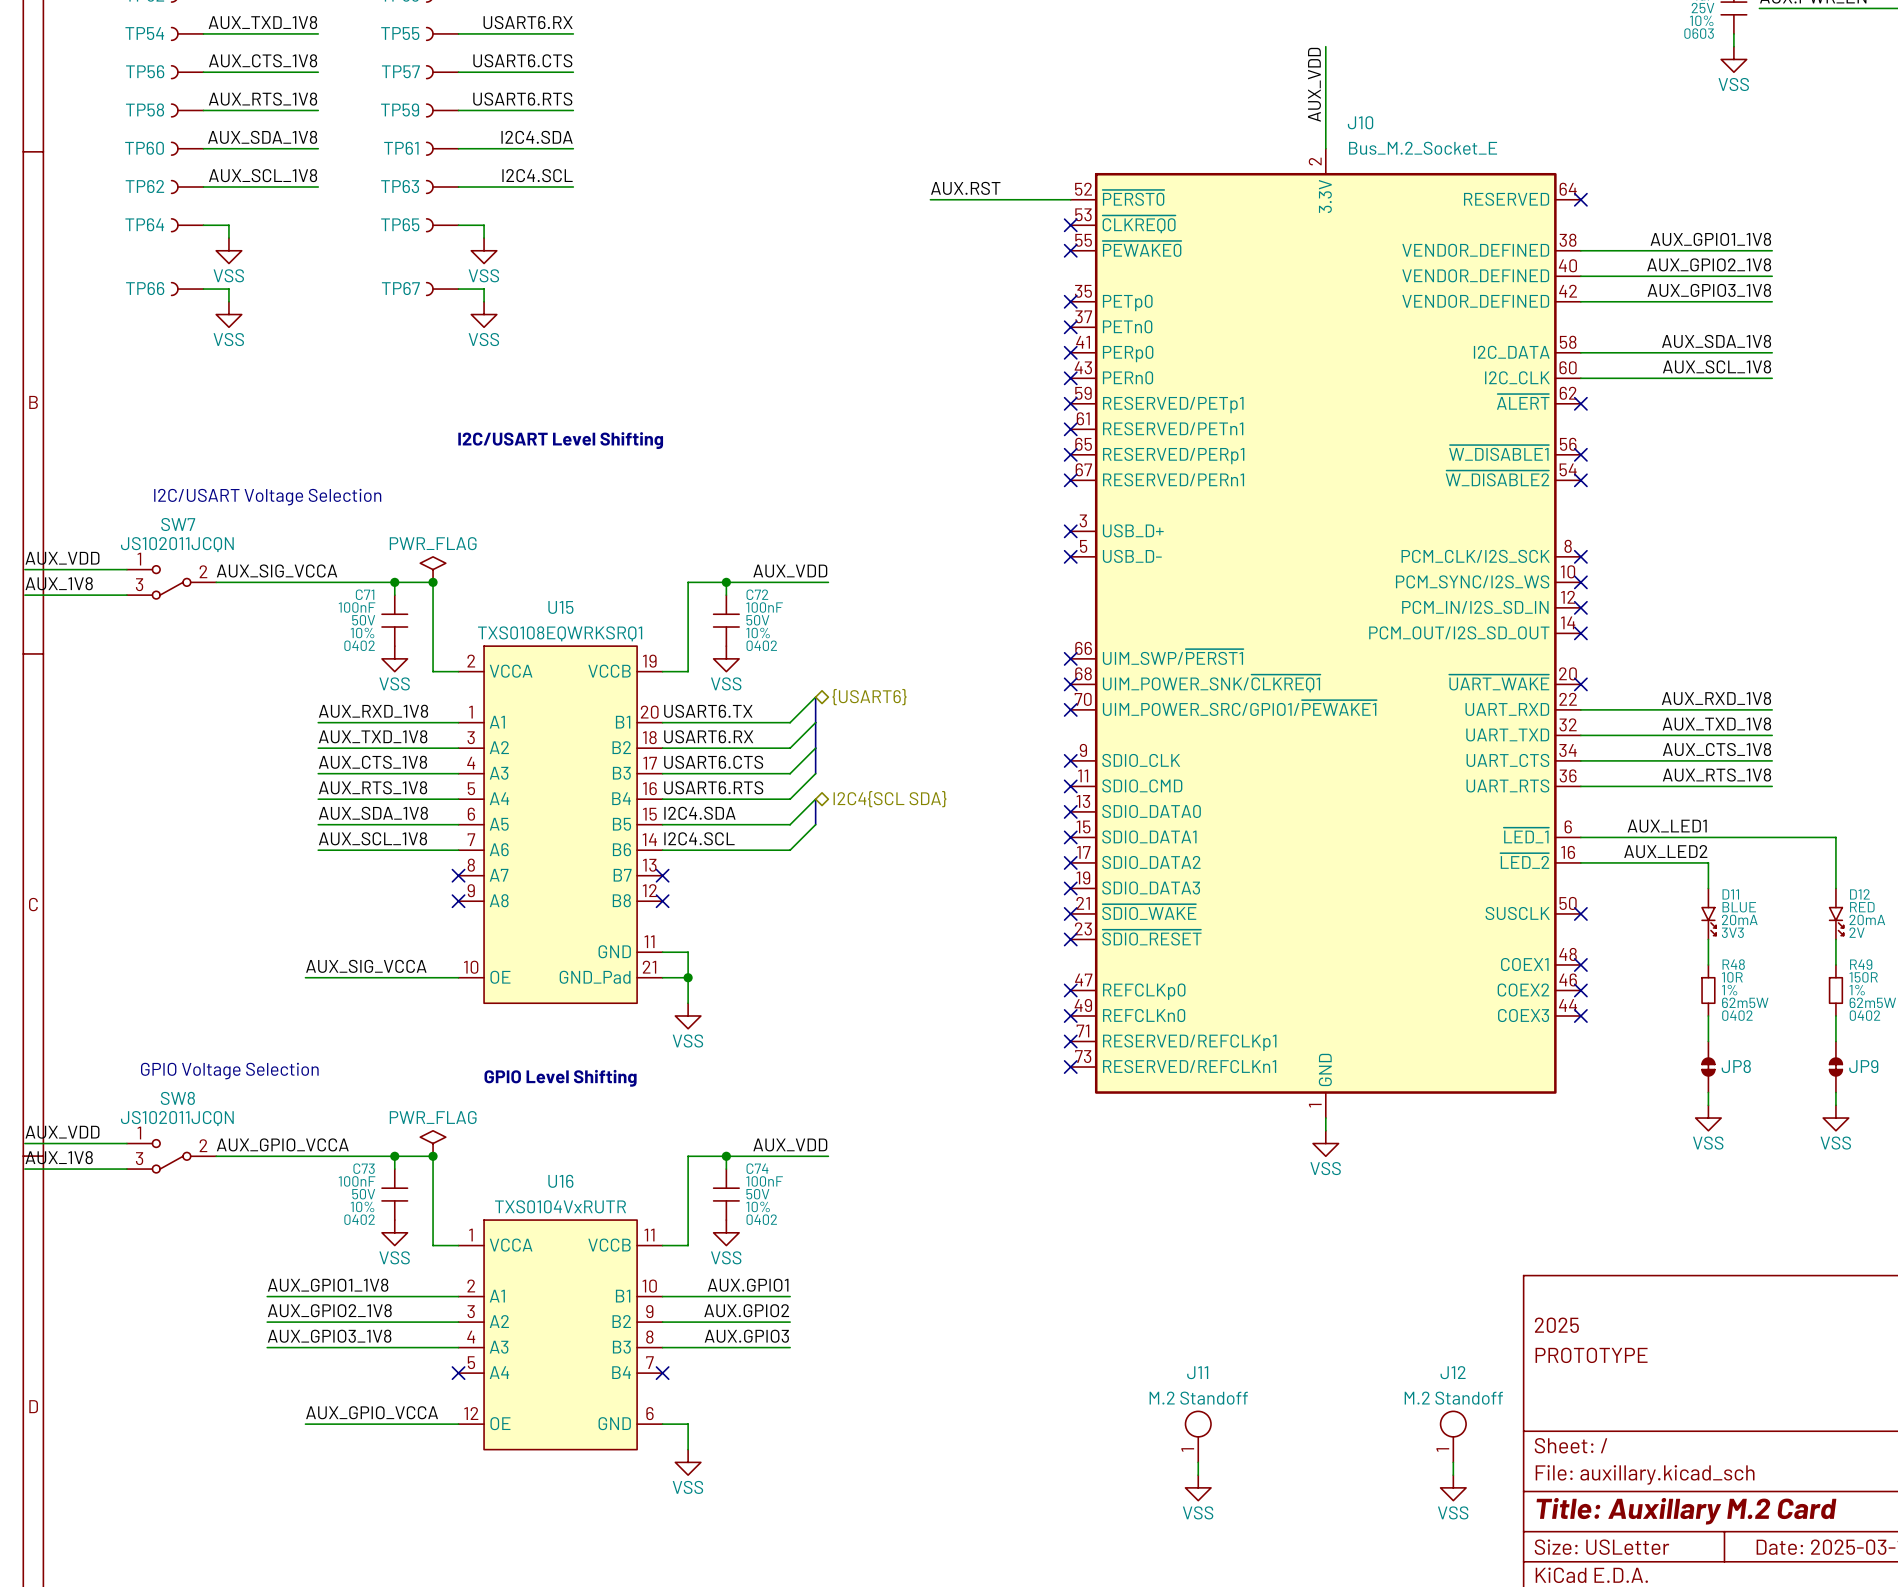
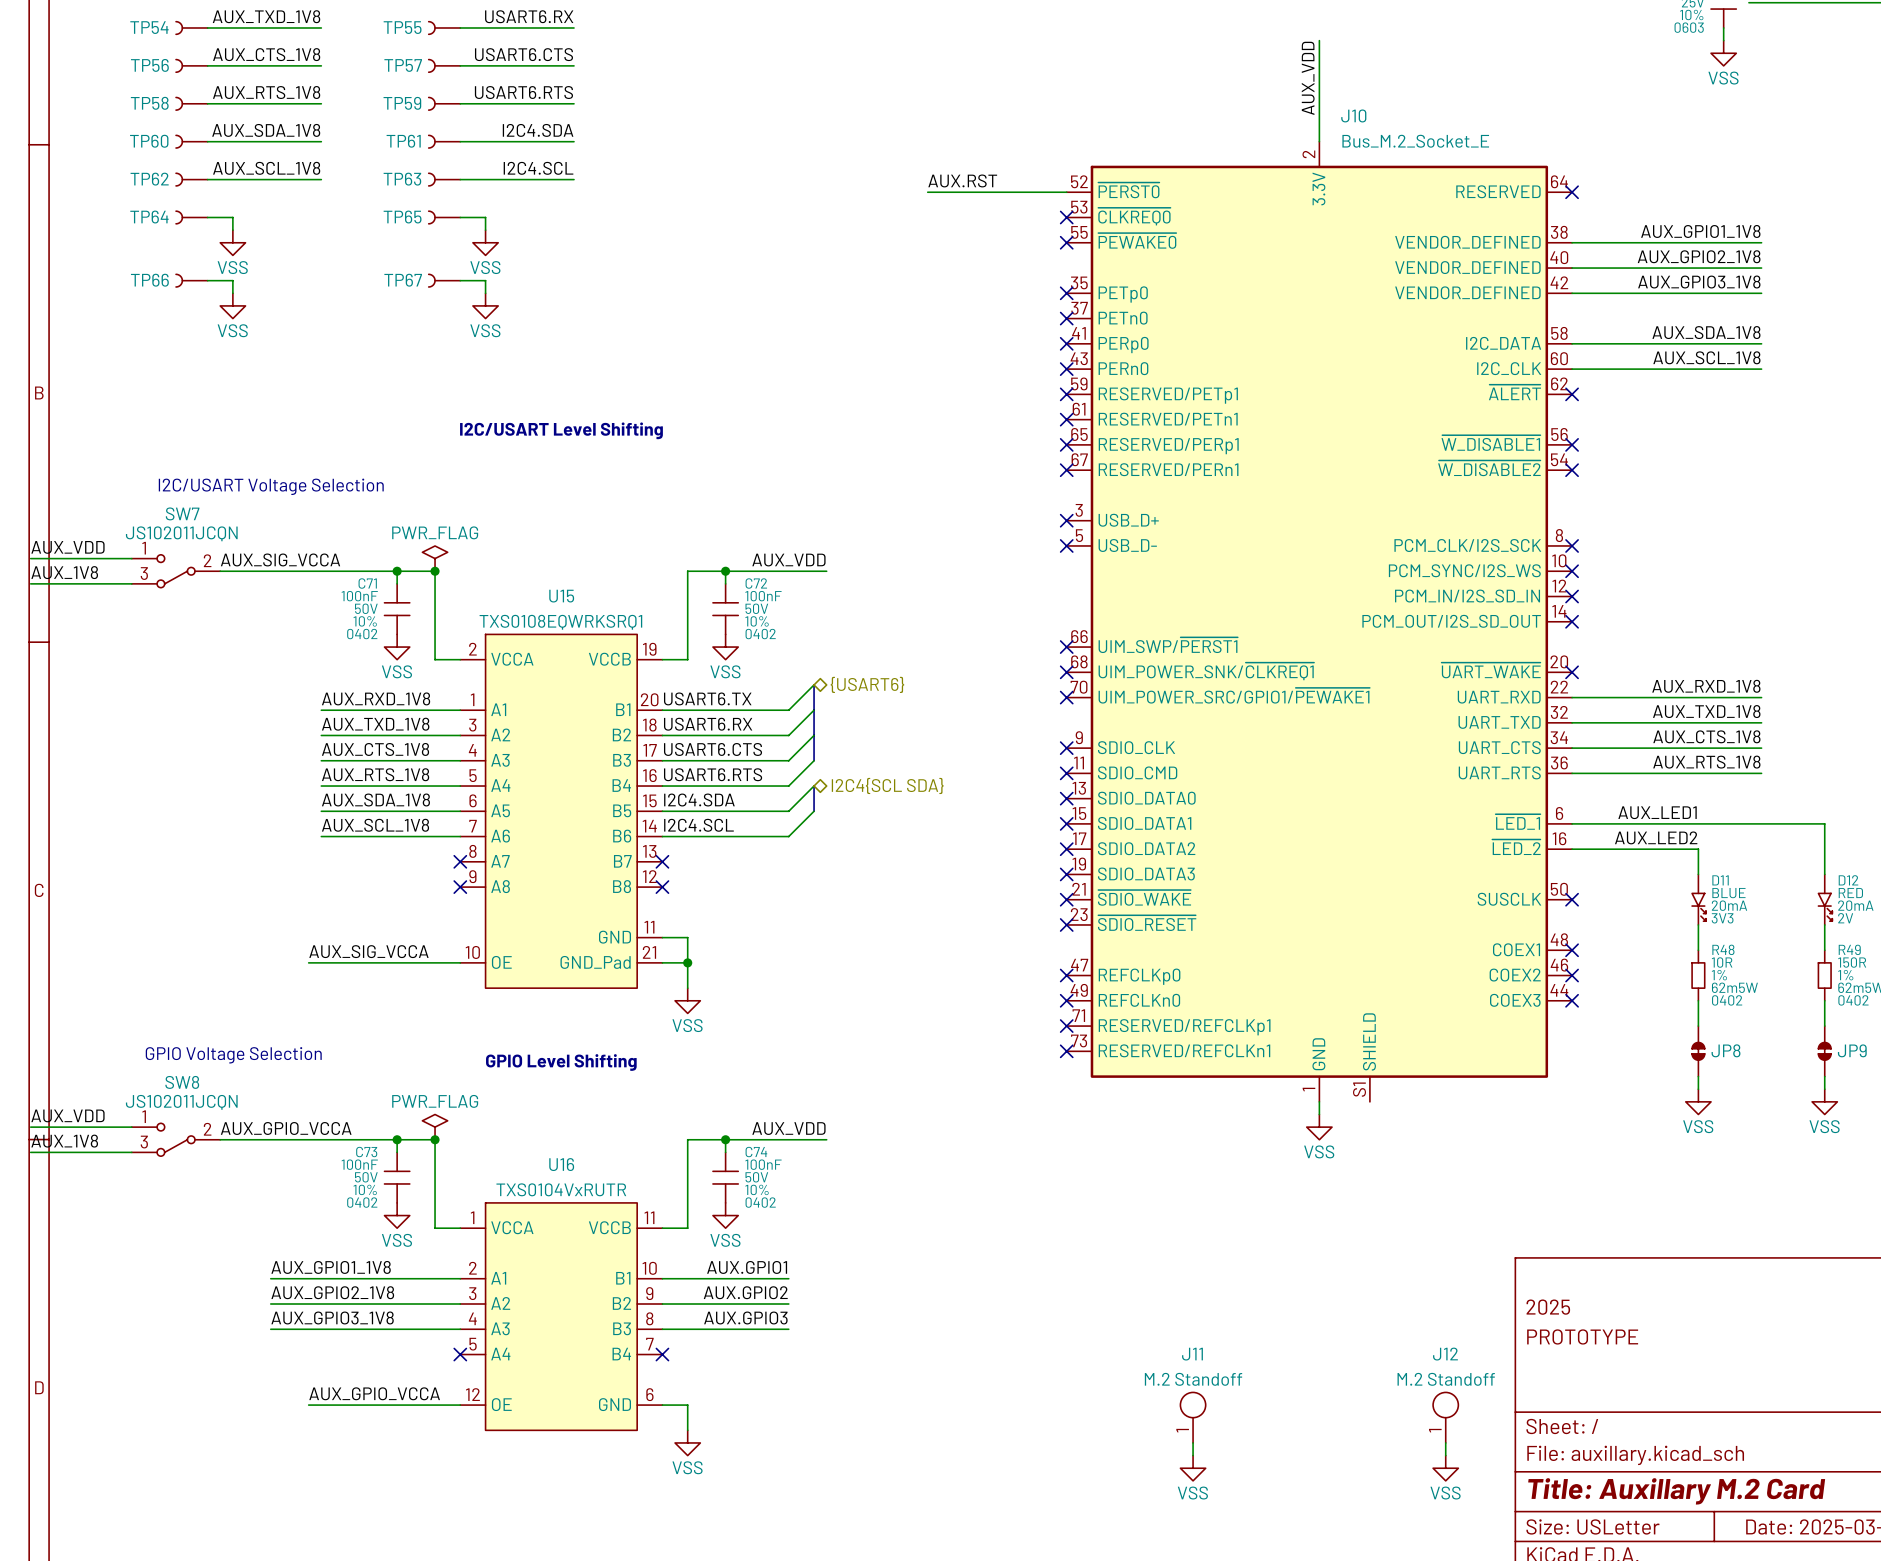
J10 symbol: [1070, 148, 1581, 1119] -> [1066, 141, 1573, 1102]

